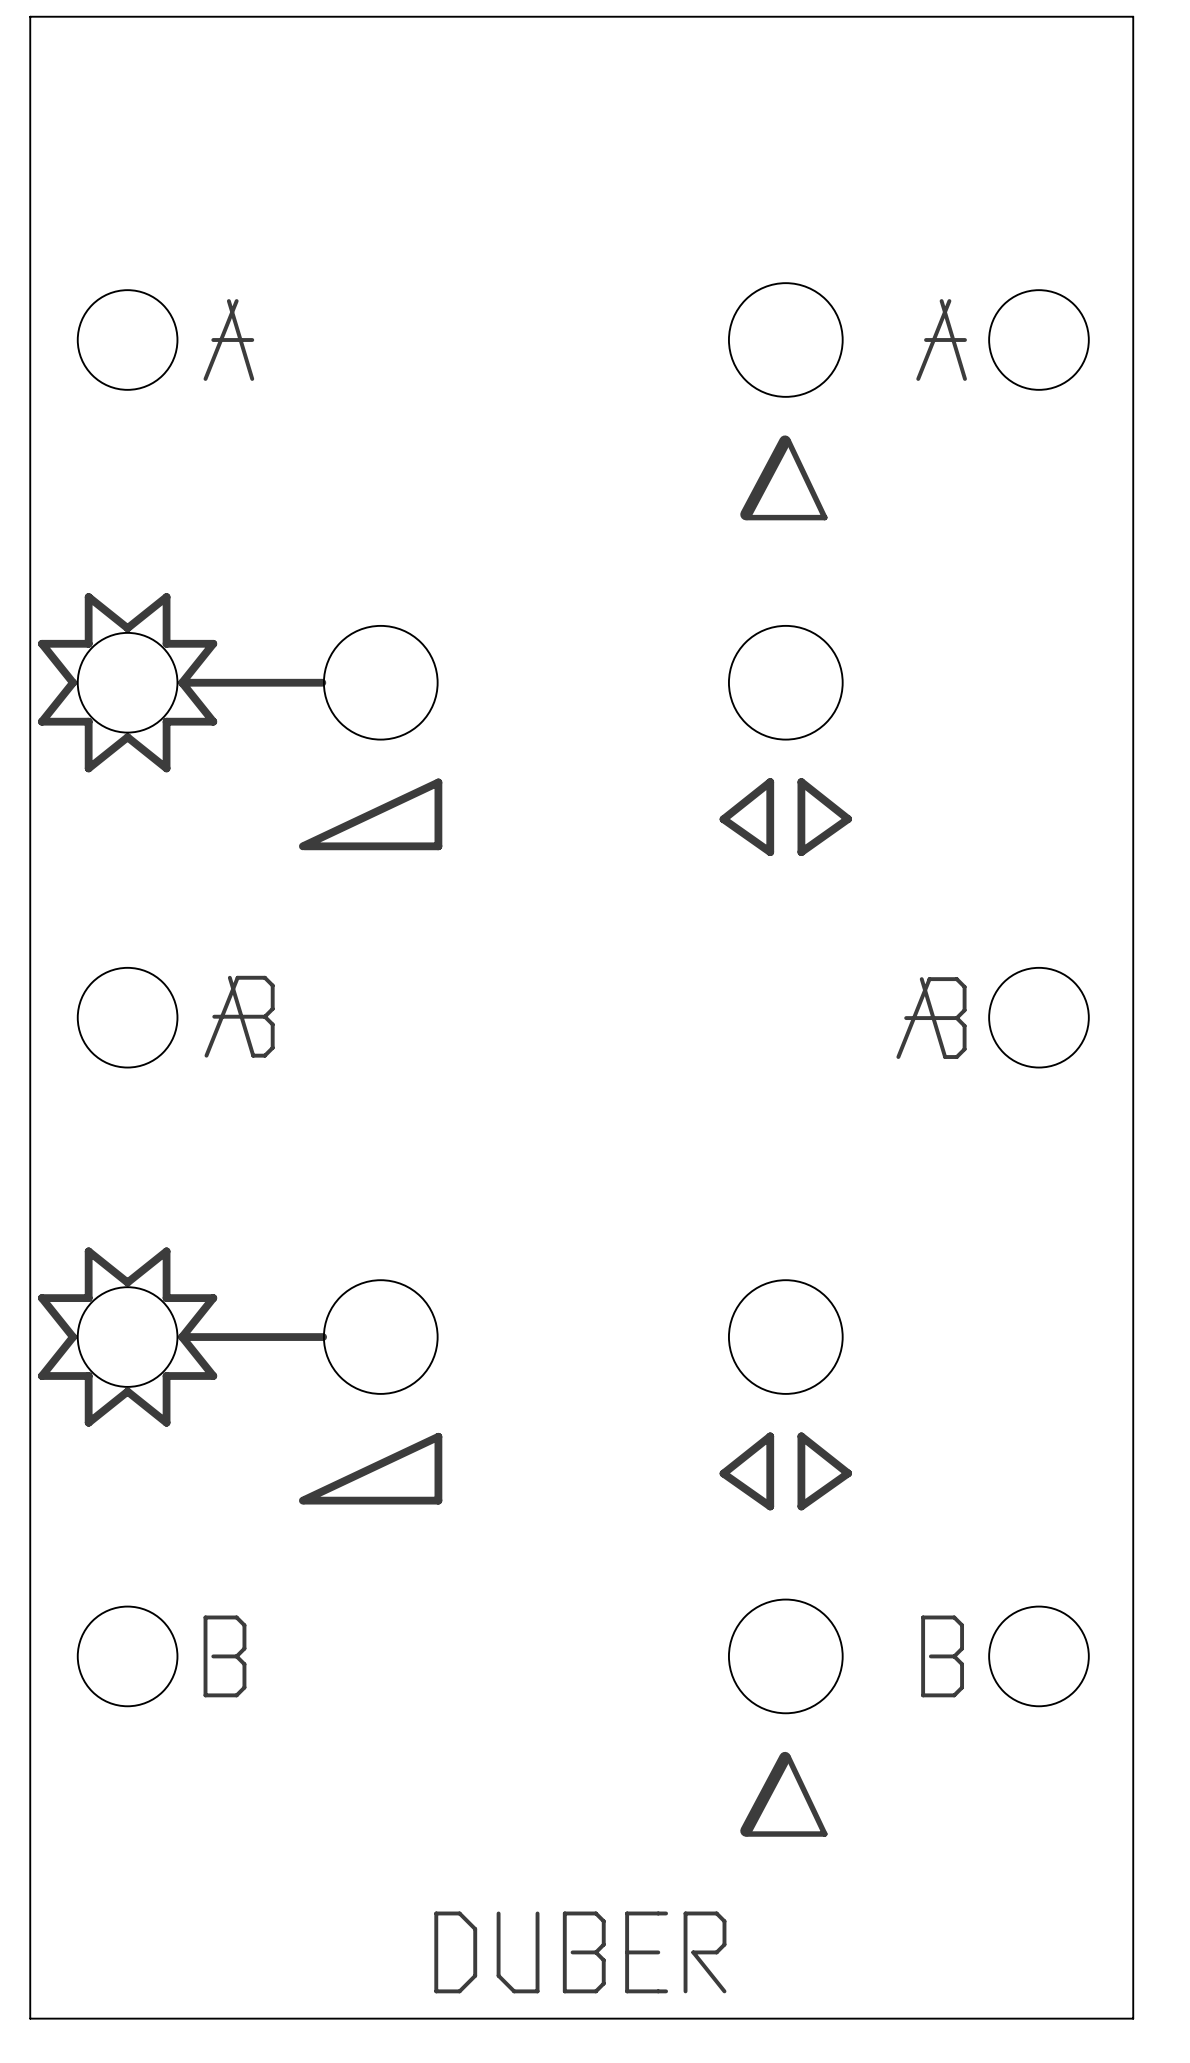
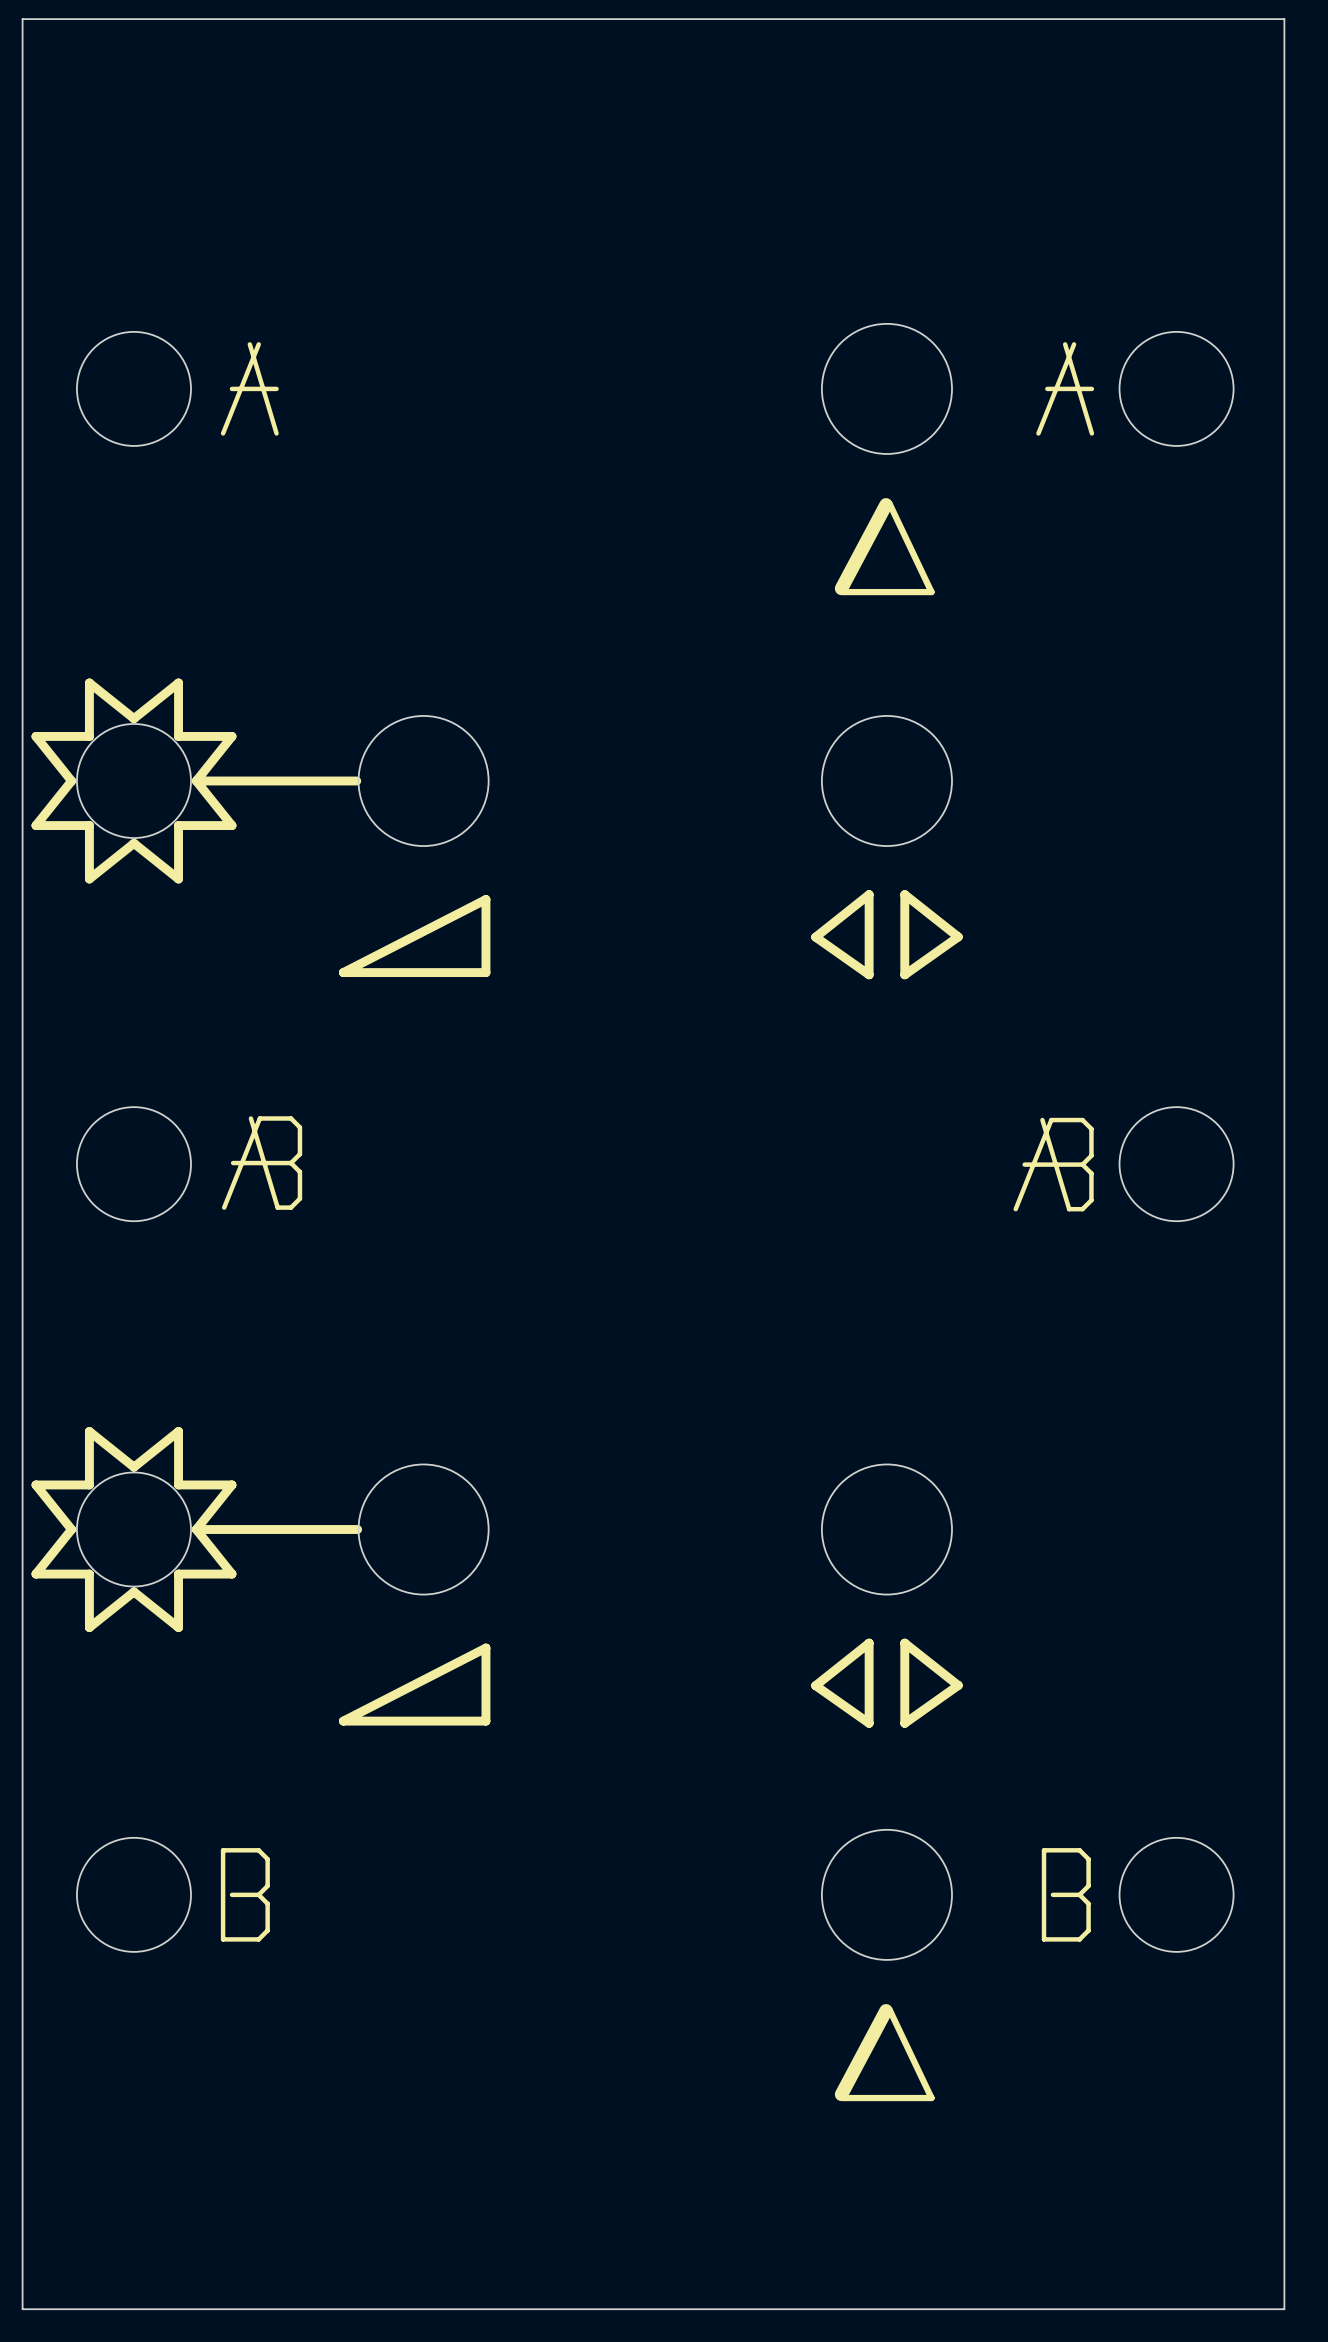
drawing shape: [298, 778, 443, 851] -> [338, 895, 491, 978]
drawing shape: [298, 1432, 443, 1505] -> [338, 1643, 491, 1726]
drawing: [434, 1911, 478, 1994] -> none
drawing: [496, 1911, 540, 1994] -> none
drawing: [562, 1911, 606, 1994] -> none
drawing: [625, 1911, 727, 1994] -> none

